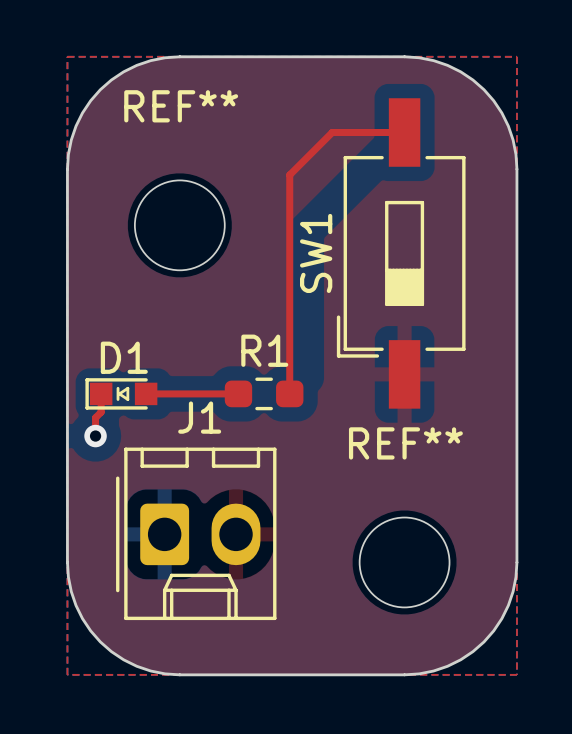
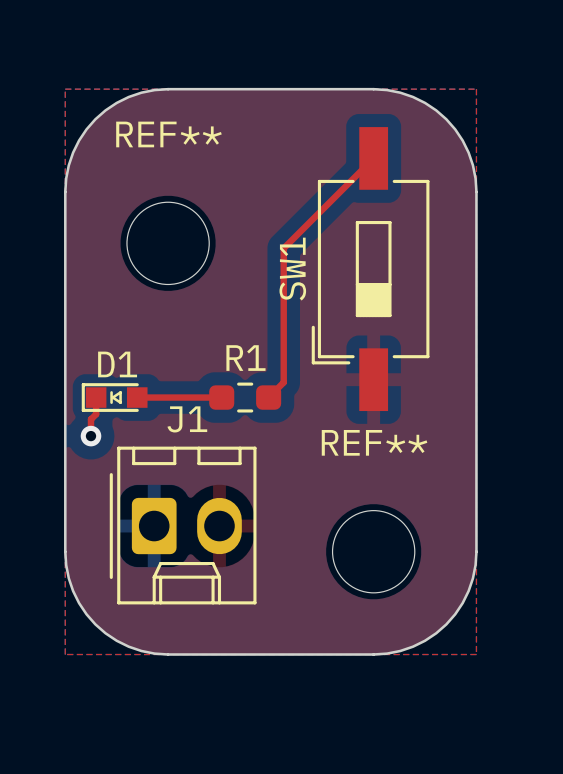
top track: (404, 132) (332, 132) (289, 174) (289, 393) -> (373, 158) (283, 248) (283, 382) (268, 397)

